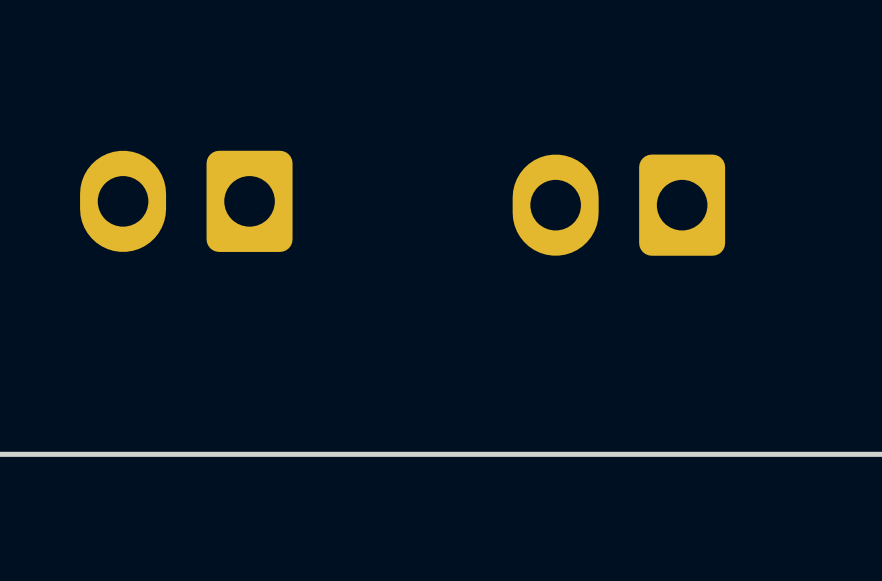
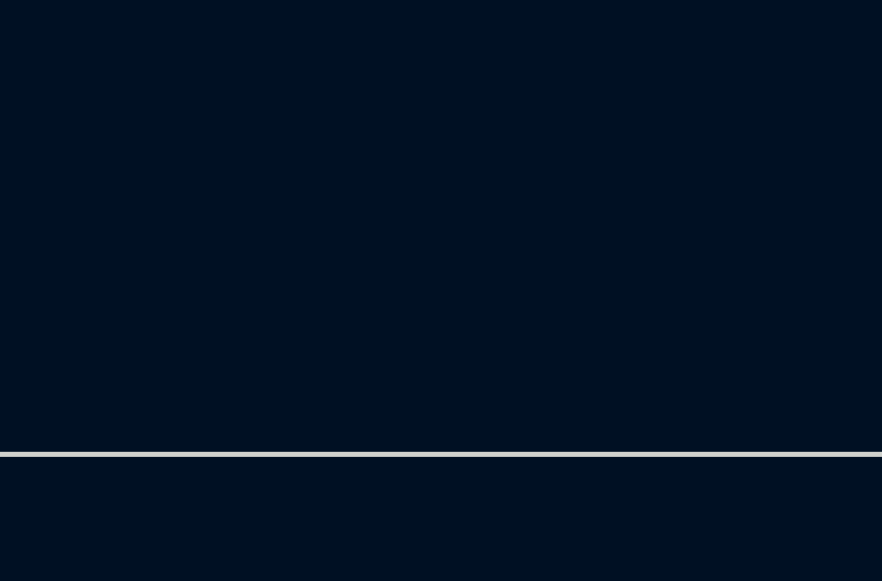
part: (186, 201) -> none
part: (618, 205) -> none

